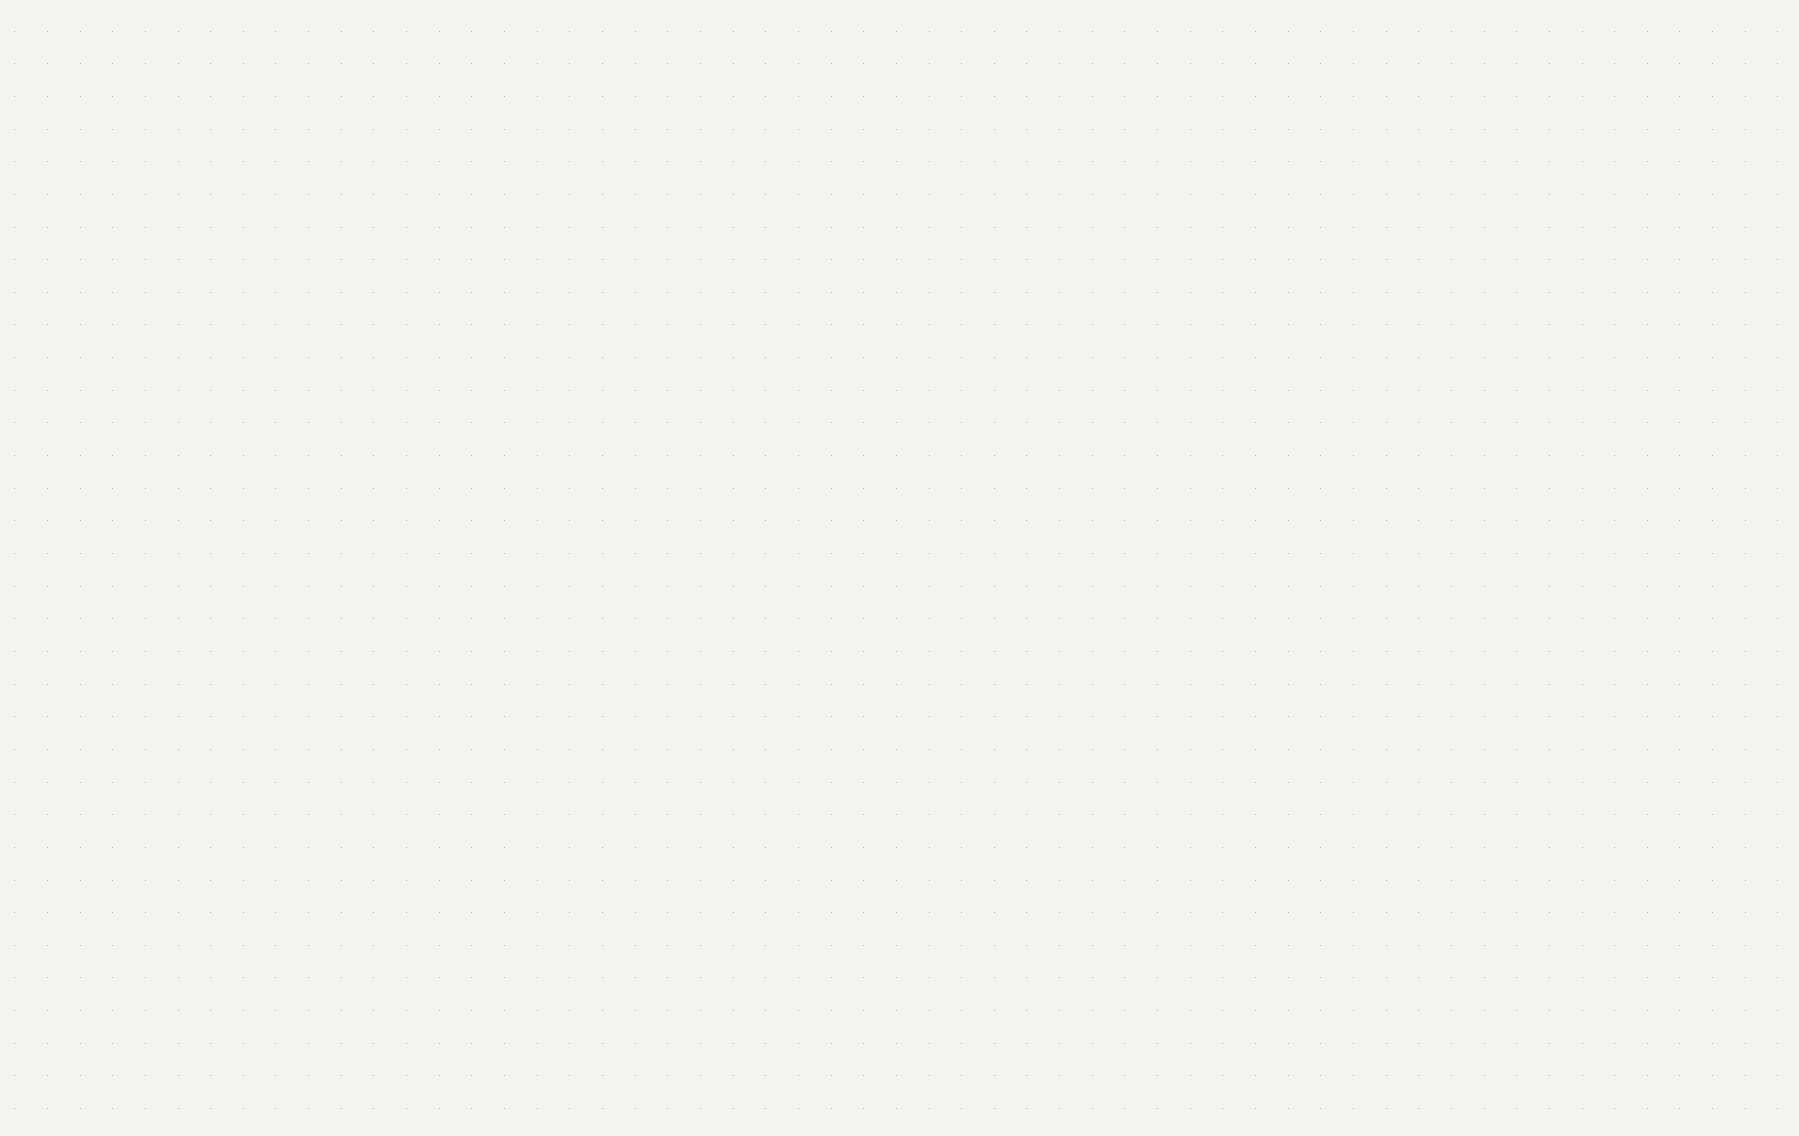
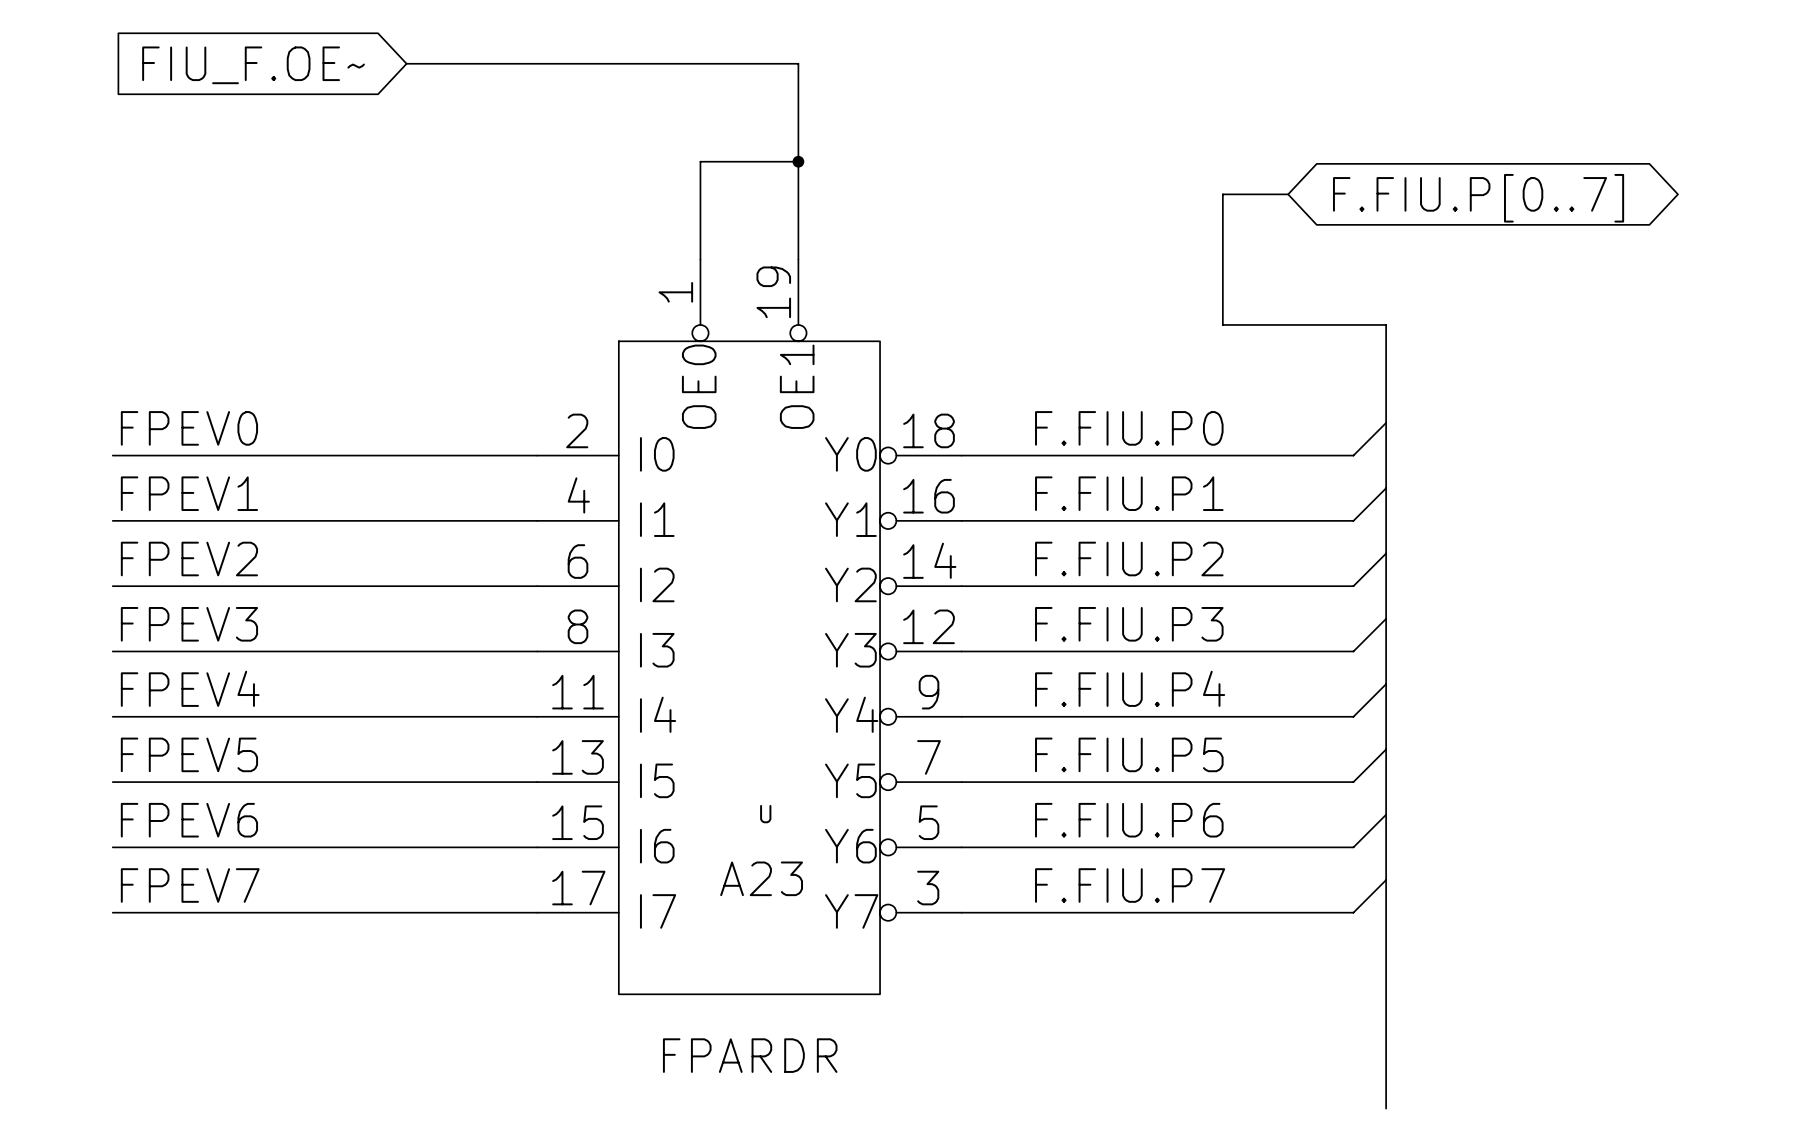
wire: none -> (406, 63) (798, 63) (798, 259)
global label: none -> FIU_F.OE~ (253, 65)
wire: none -> (798, 161) (700, 161) (700, 259)
junction: none -> (798, 161)
bus: none -> (1288, 194) (1222, 194) (1222, 324) (1386, 324) (1386, 1108)
global label: none -> F.FIU.P[0..7] (1478, 198)
wire: none -> (1386, 422) (1353, 455) (961, 455)
label: none -> FPEV0 (189, 428)
label: none -> F.FIU.P0 (1129, 428)
wire: none -> (112, 455) (537, 455)
wire: none -> (1386, 488) (1353, 520) (961, 520)
label: none -> FPEV1 (189, 493)
label: none -> F.FIU.P1 (1129, 493)
wire: none -> (112, 520) (537, 520)
wire: none -> (1386, 553) (1353, 586) (961, 586)
label: none -> FPEV2 (189, 559)
label: none -> F.FIU.P2 (1129, 559)
wire: none -> (112, 586) (537, 586)
wire: none -> (1386, 618) (1353, 651) (961, 651)
label: none -> FPEV3 (189, 624)
label: none -> F.FIU.P3 (1129, 624)
U: none -> (749, 626)
wire: none -> (112, 651) (537, 651)
wire: none -> (1386, 684) (1353, 716) (961, 716)
label: none -> FPEV4 (190, 688)
label: none -> F.FIU.P4 (1130, 688)
wire: none -> (112, 716) (537, 716)
wire: none -> (1386, 749) (1353, 782) (961, 782)
label: none -> FPEV5 (189, 754)
label: none -> F.FIU.P5 (1129, 754)
wire: none -> (112, 782) (537, 782)
wire: none -> (1386, 814) (1353, 847) (961, 847)
label: none -> FPEV6 (189, 820)
label: none -> F.FIU.P6 (1129, 820)
wire: none -> (112, 847) (537, 847)
wire: none -> (1386, 880) (1353, 912) (961, 912)
label: none -> FPEV7 (190, 885)
label: none -> F.FIU.P7 (1130, 885)
wire: none -> (112, 912) (537, 912)

